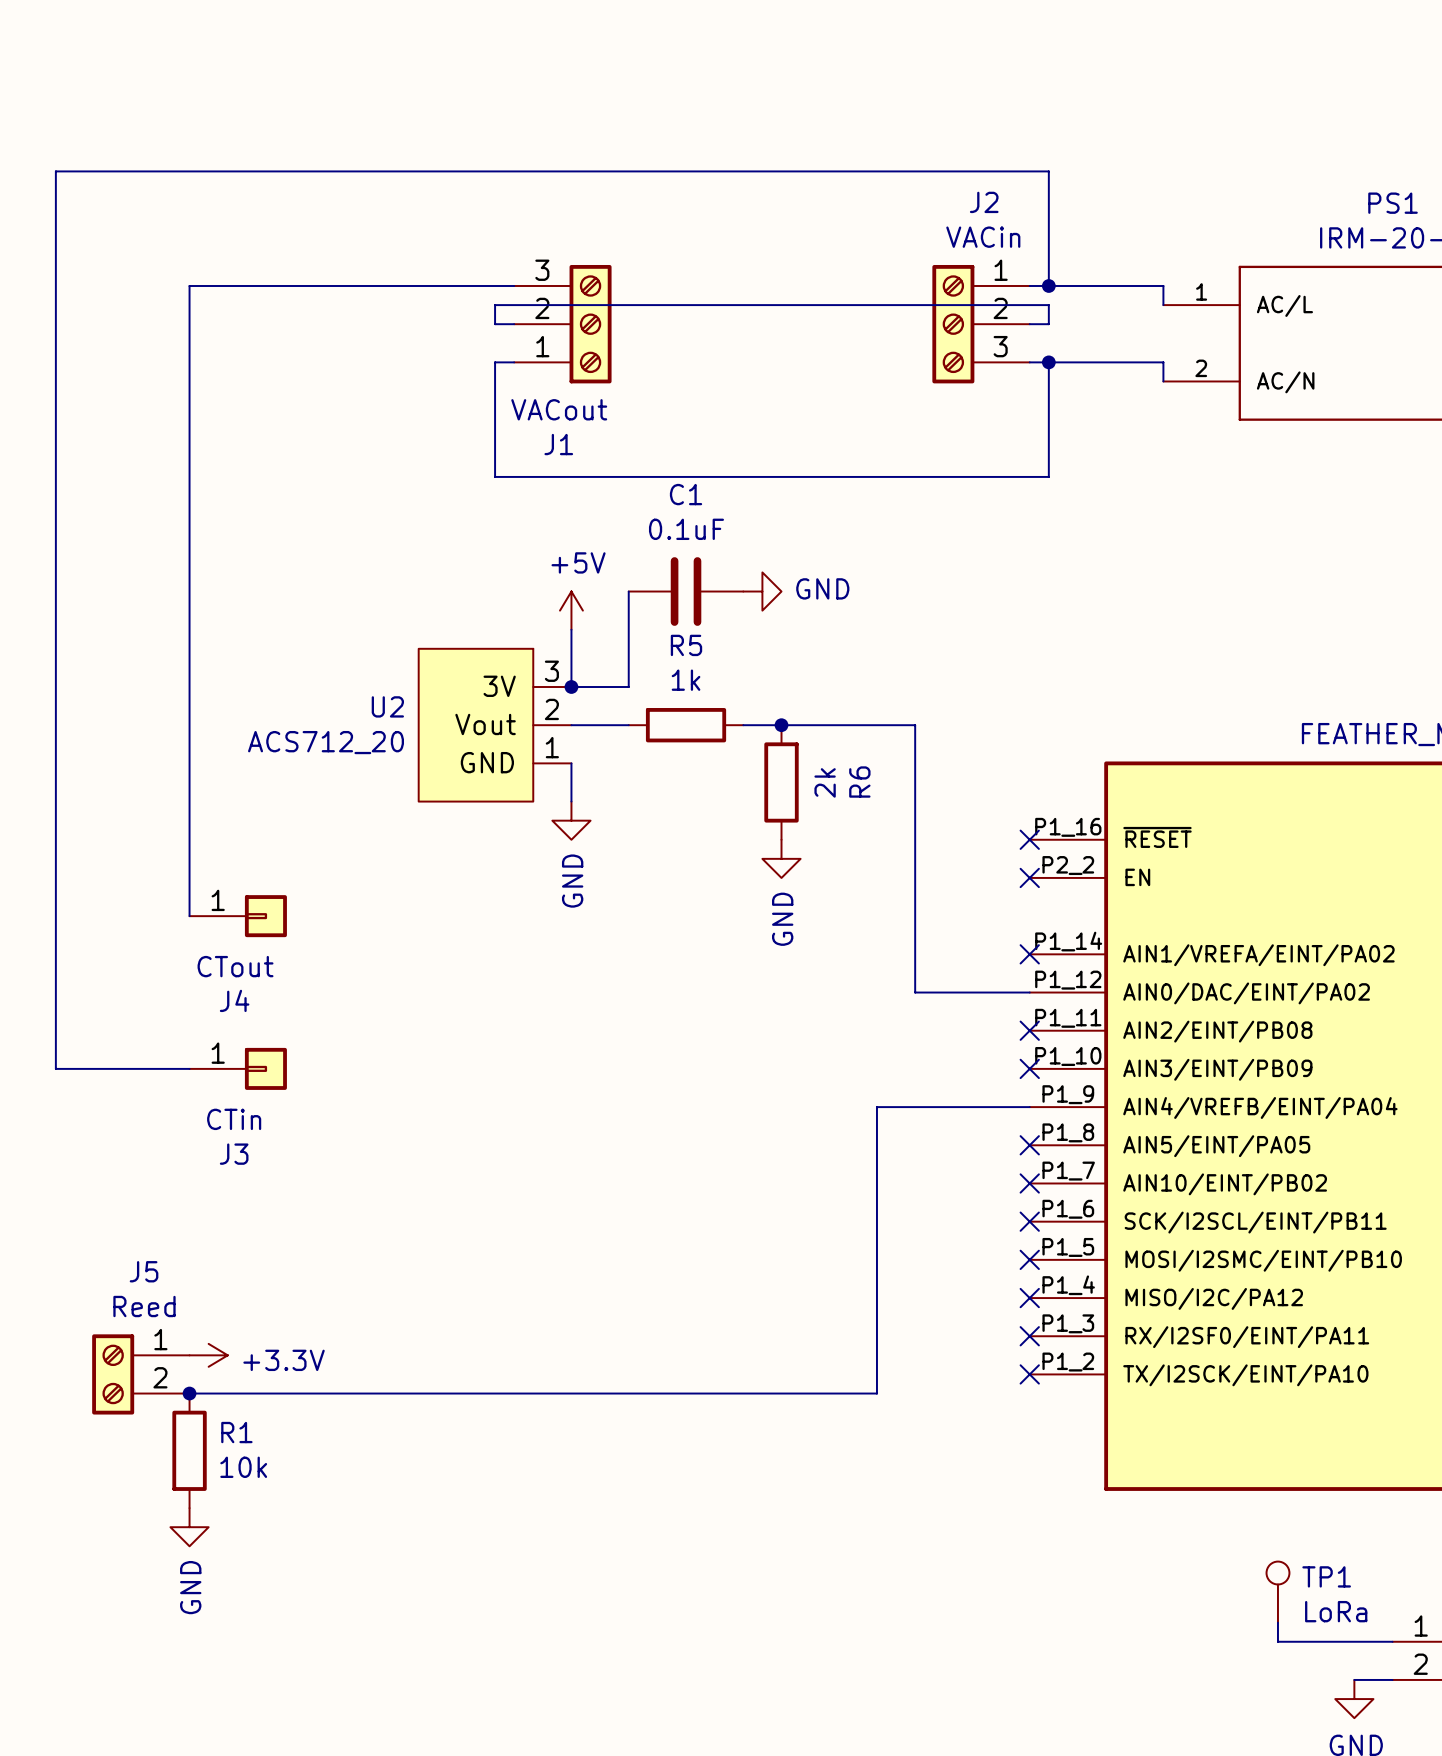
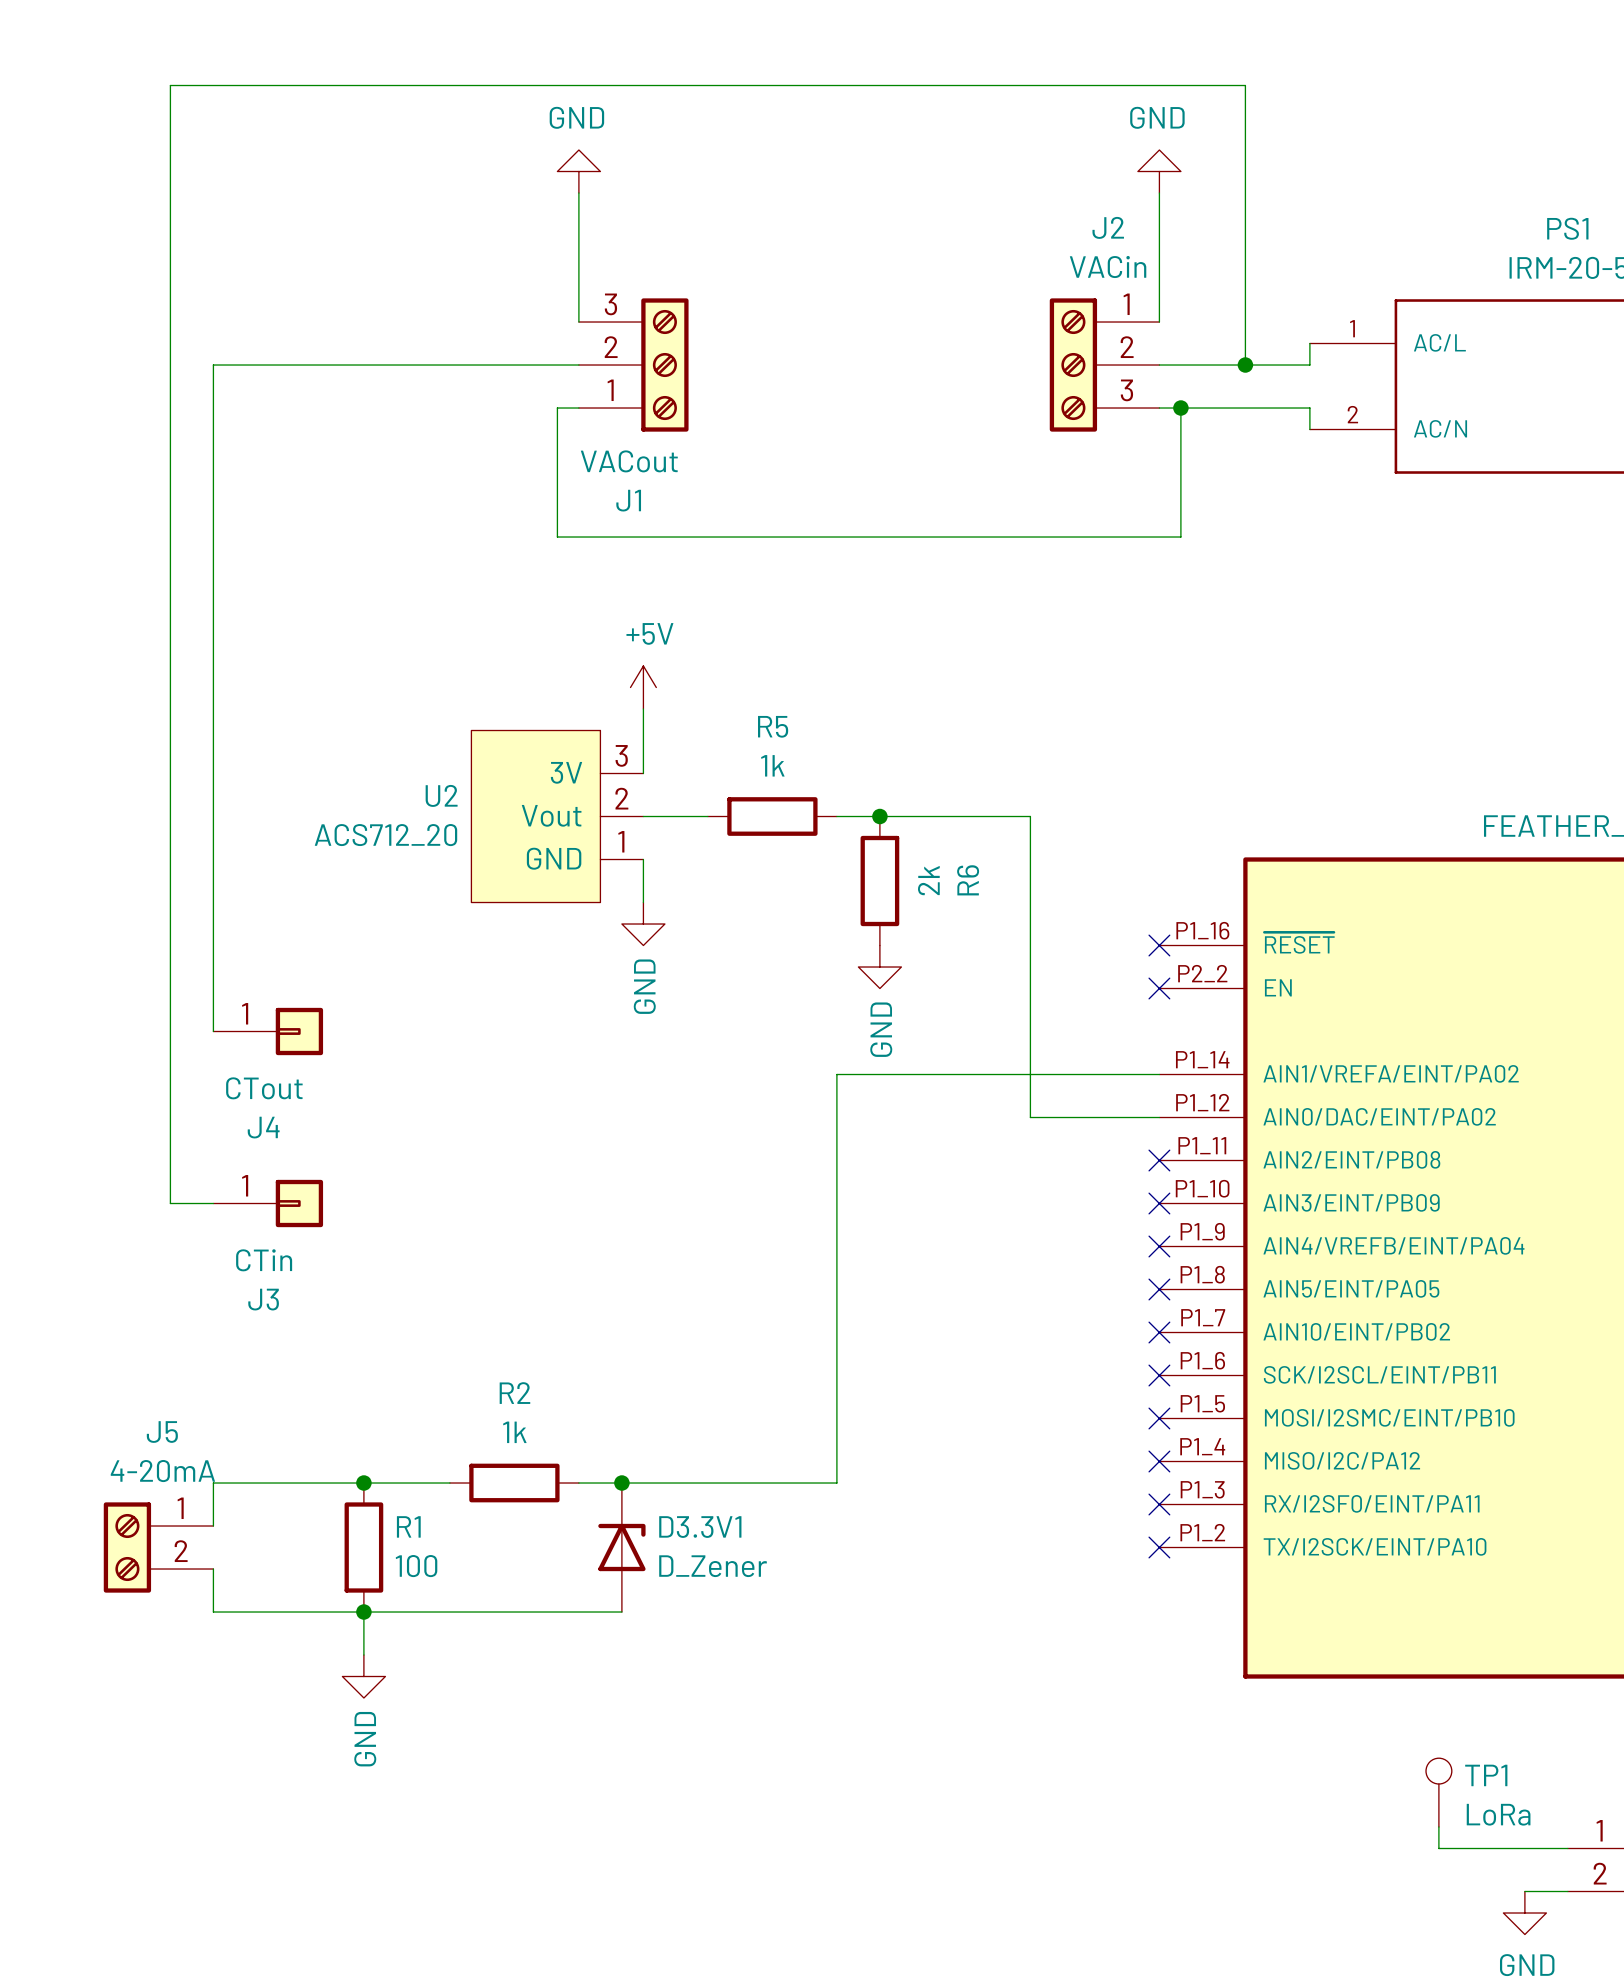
power symbol: none -> GND (578, 171)
power symbol: none -> GND (1159, 171)
wire: none -> (578, 193) (578, 322)
wire: none -> (1159, 193) (1159, 322)
wire: (514, 285) (189, 285) (189, 324) -> (557, 365) (213, 365)
wire: (1029, 285) (1163, 285) (1163, 305) -> (1180, 365) (1309, 365) (1309, 343)
wire: (1048, 285) (1048, 171) (55, 171) (55, 1068) (151, 1068) -> (1245, 365) (1245, 85) (170, 85) (170, 1203)
junction position: (1048, 285) -> (1245, 365)
wire: (495, 324) (495, 305) (1048, 305) (1048, 324) -> none
wire: (628, 591) (628, 687) (571, 687) -> none
C1: 0.1uF (686, 591) -> none
power symbol: GND (762, 591) -> none
junction: (571, 687) -> none
wire: none -> (1159, 1074) (836, 1074) (836, 1483) (578, 1483)
no-connect mark: (1029, 954) -> none
wire: (1029, 1107) (876, 1107) (876, 1393) (189, 1393) -> (621, 1612) (213, 1612) (213, 1569)
no-connect mark: none -> (1159, 1246)
J5 value: Reed (144, 1306) -> 4-20mA (162, 1471)
junction: none -> (363, 1483)
wire: none -> (449, 1483) (213, 1483) (213, 1526)
R2: none -> 1k (514, 1483)
junction: none -> (621, 1483)
power symbol: +3.3V (208, 1355) -> none
D3.3V1: none -> D_Zener (621, 1547)
junction: (189, 1393) -> none
wire: none -> (363, 1612) (363, 1655)
junction: none -> (363, 1612)
R1 position: (189, 1450) -> (363, 1547)
R1 value: 10k (243, 1467) -> 100 (416, 1566)
power symbol position: GND (189, 1527) -> GND (363, 1676)

